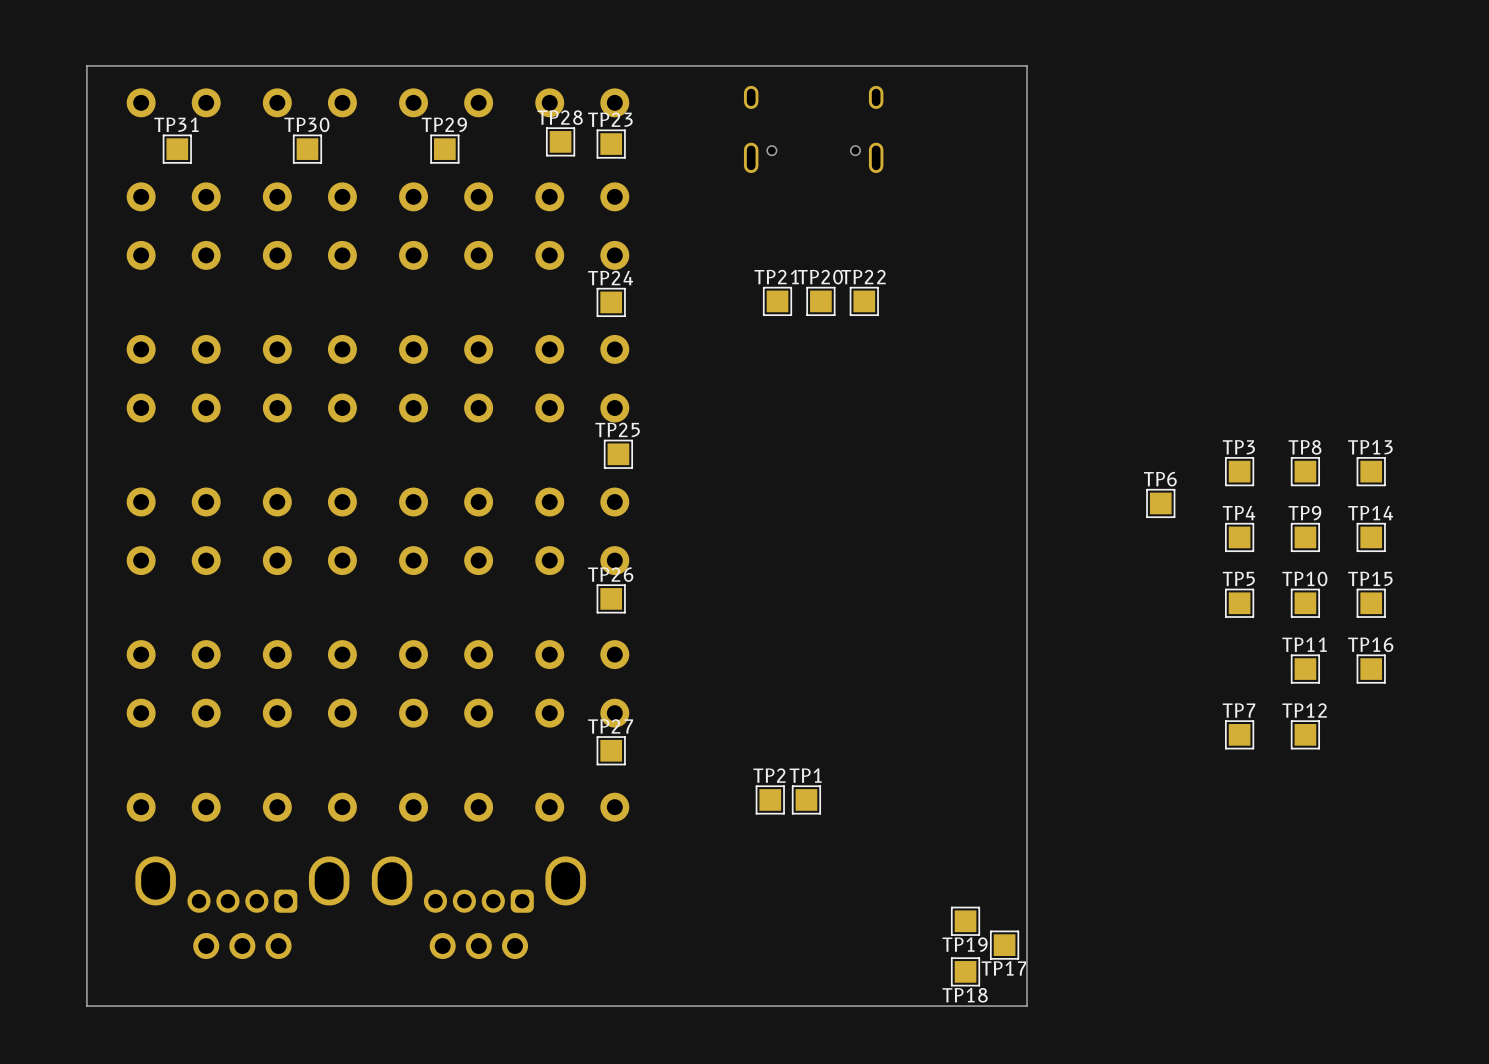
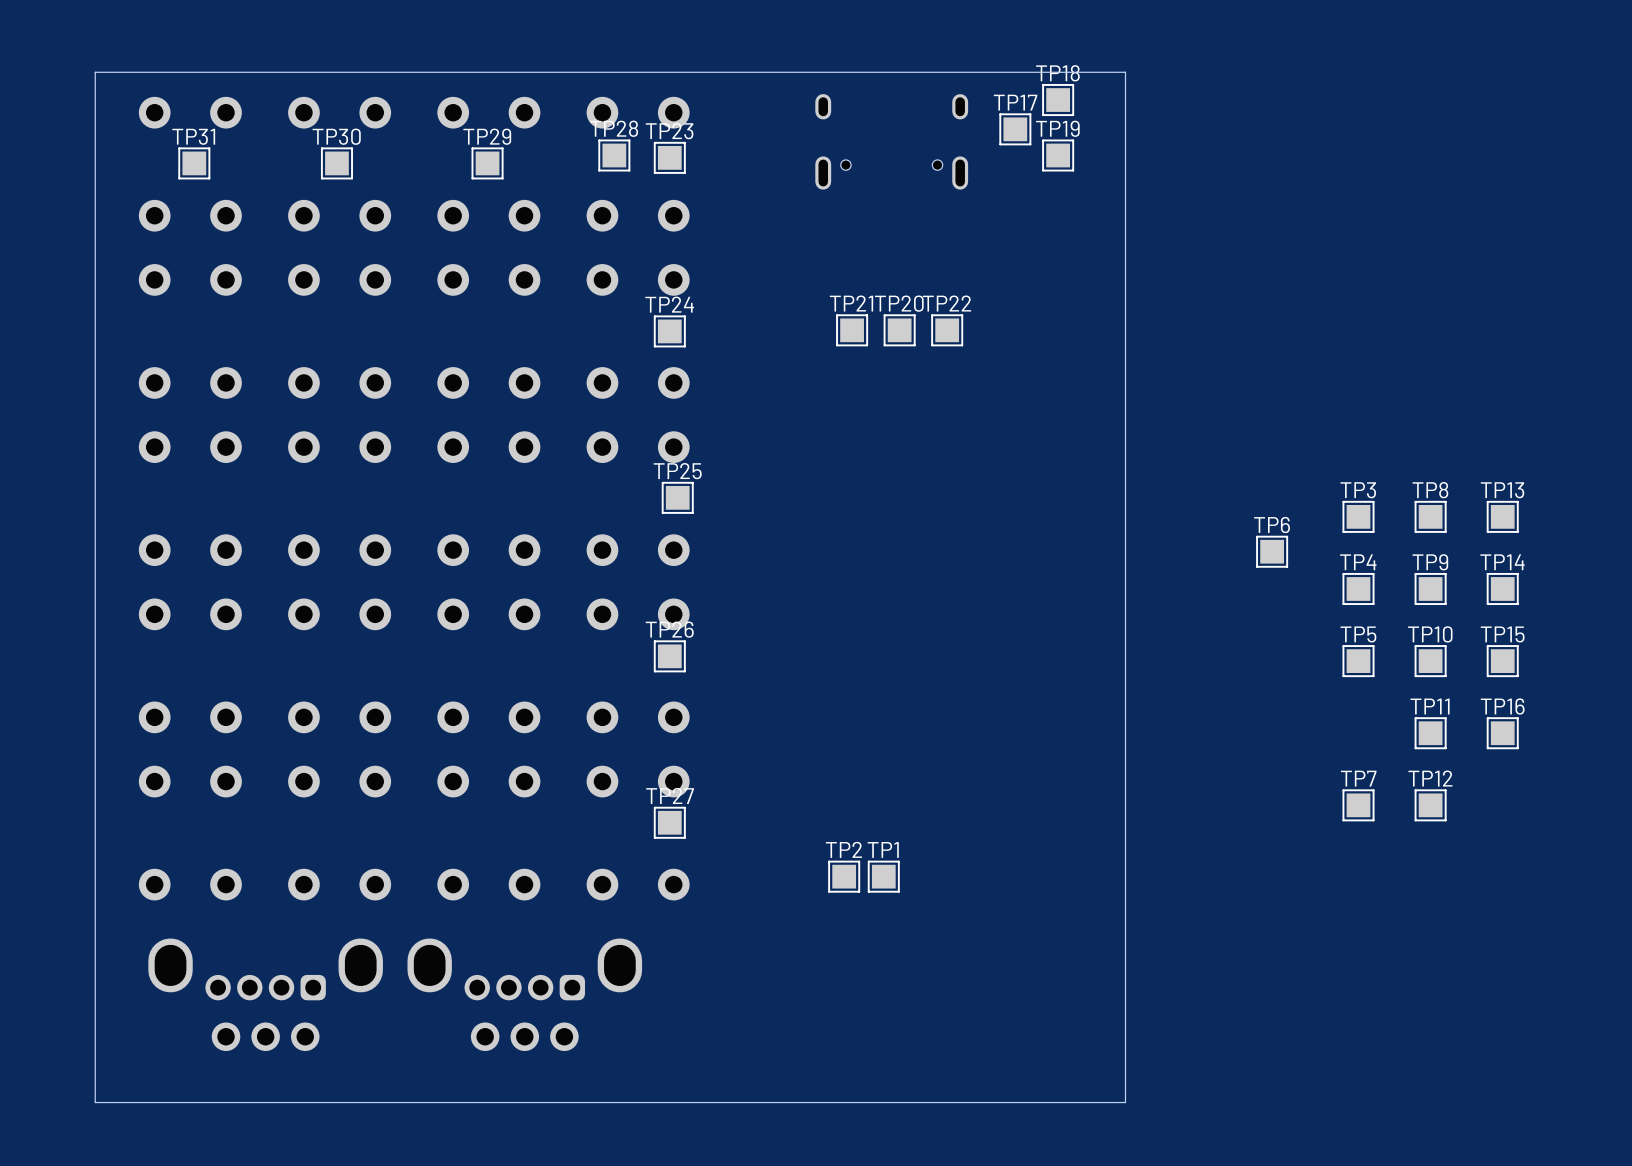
TP19 position: (965, 921) -> (1058, 155)
TP19 name position: TP19 (965, 944) -> TP19 (1057, 128)
TP17 position: (1004, 945) -> (1015, 129)
TP17 name position: TP17 (1004, 968) -> TP17 (1015, 102)
TP18 position: (965, 971) -> (1058, 100)
TP18 name position: TP18 (965, 995) -> TP18 (1057, 73)

